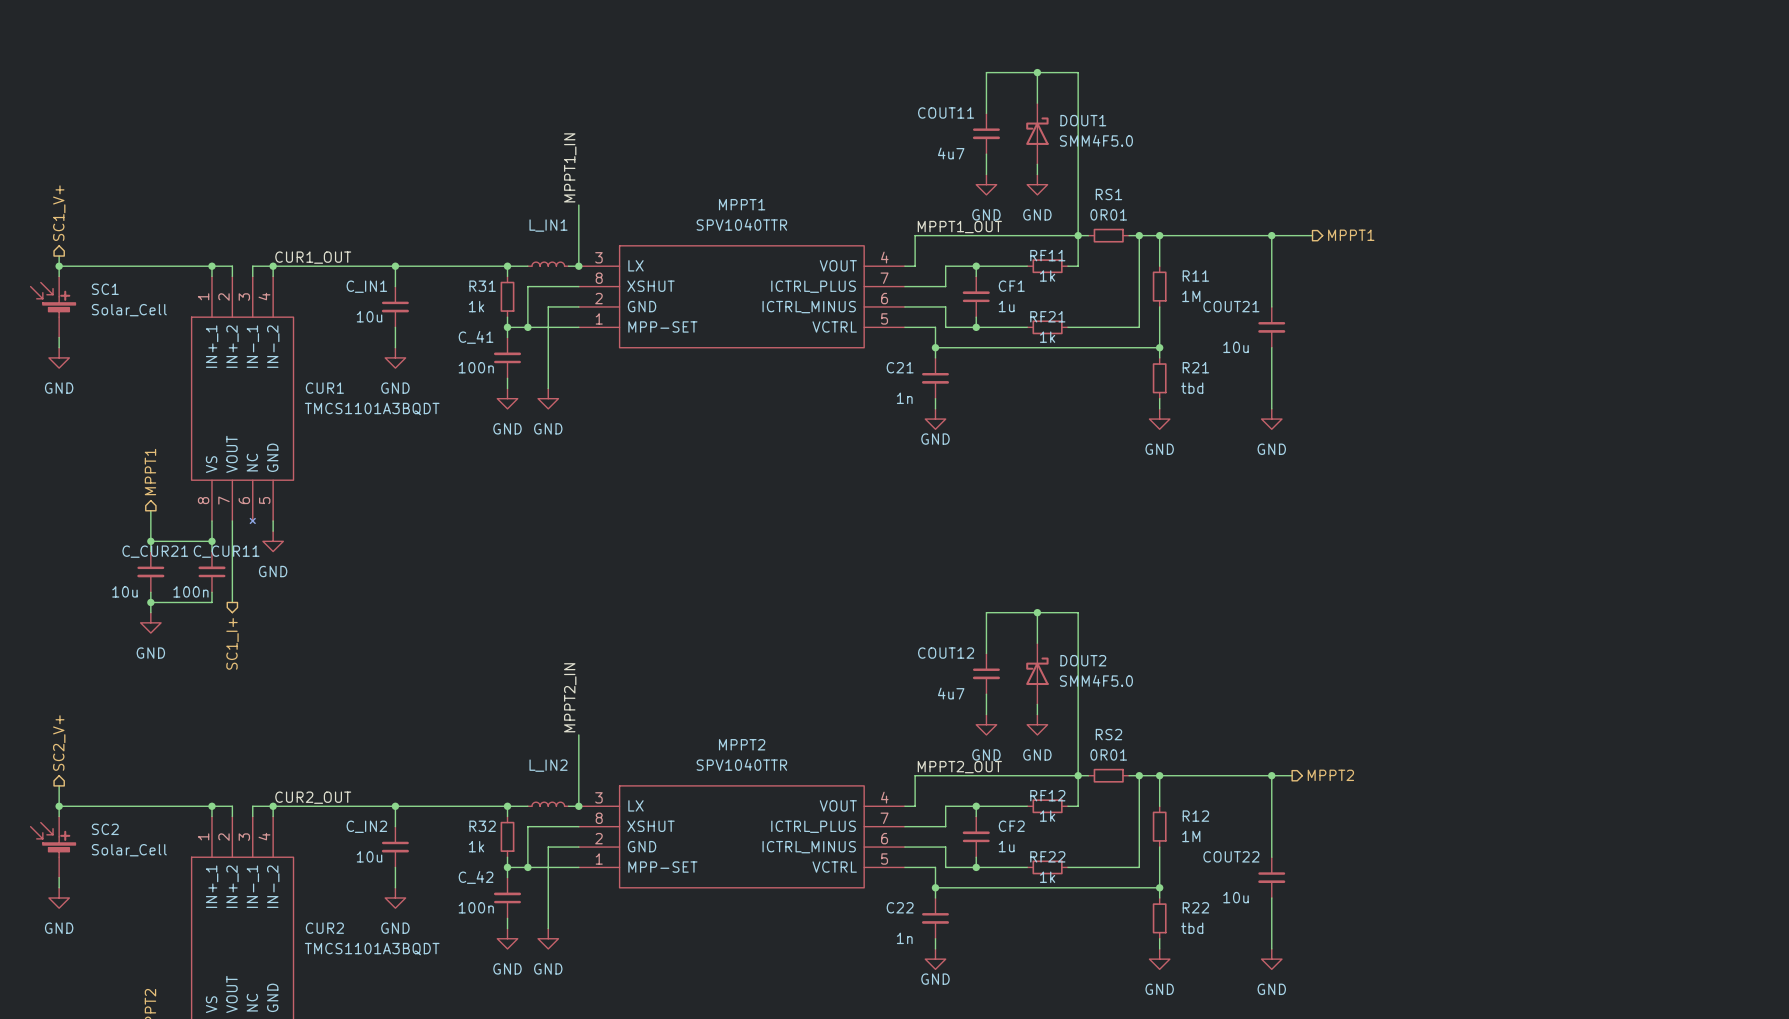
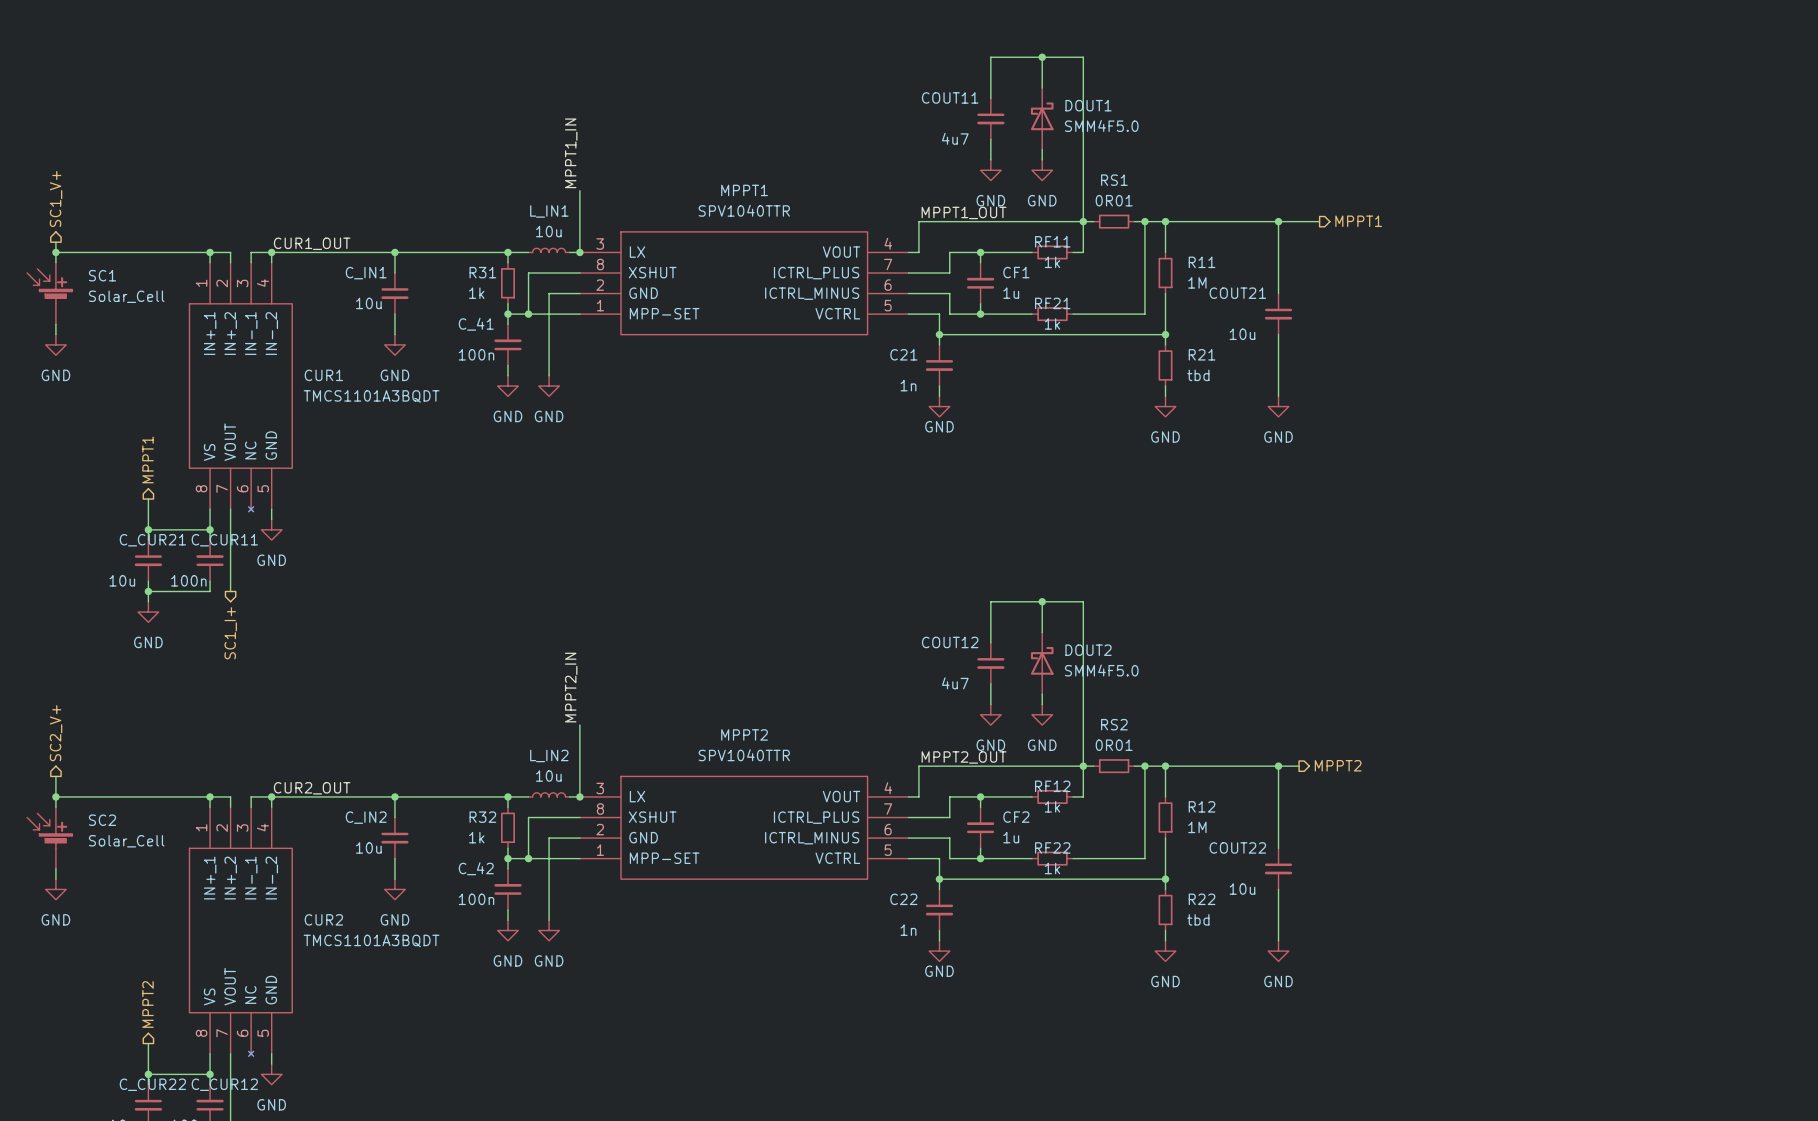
L_IN1 value: none -> 10u (548, 231)
L_IN2 value: none -> 10u (548, 776)

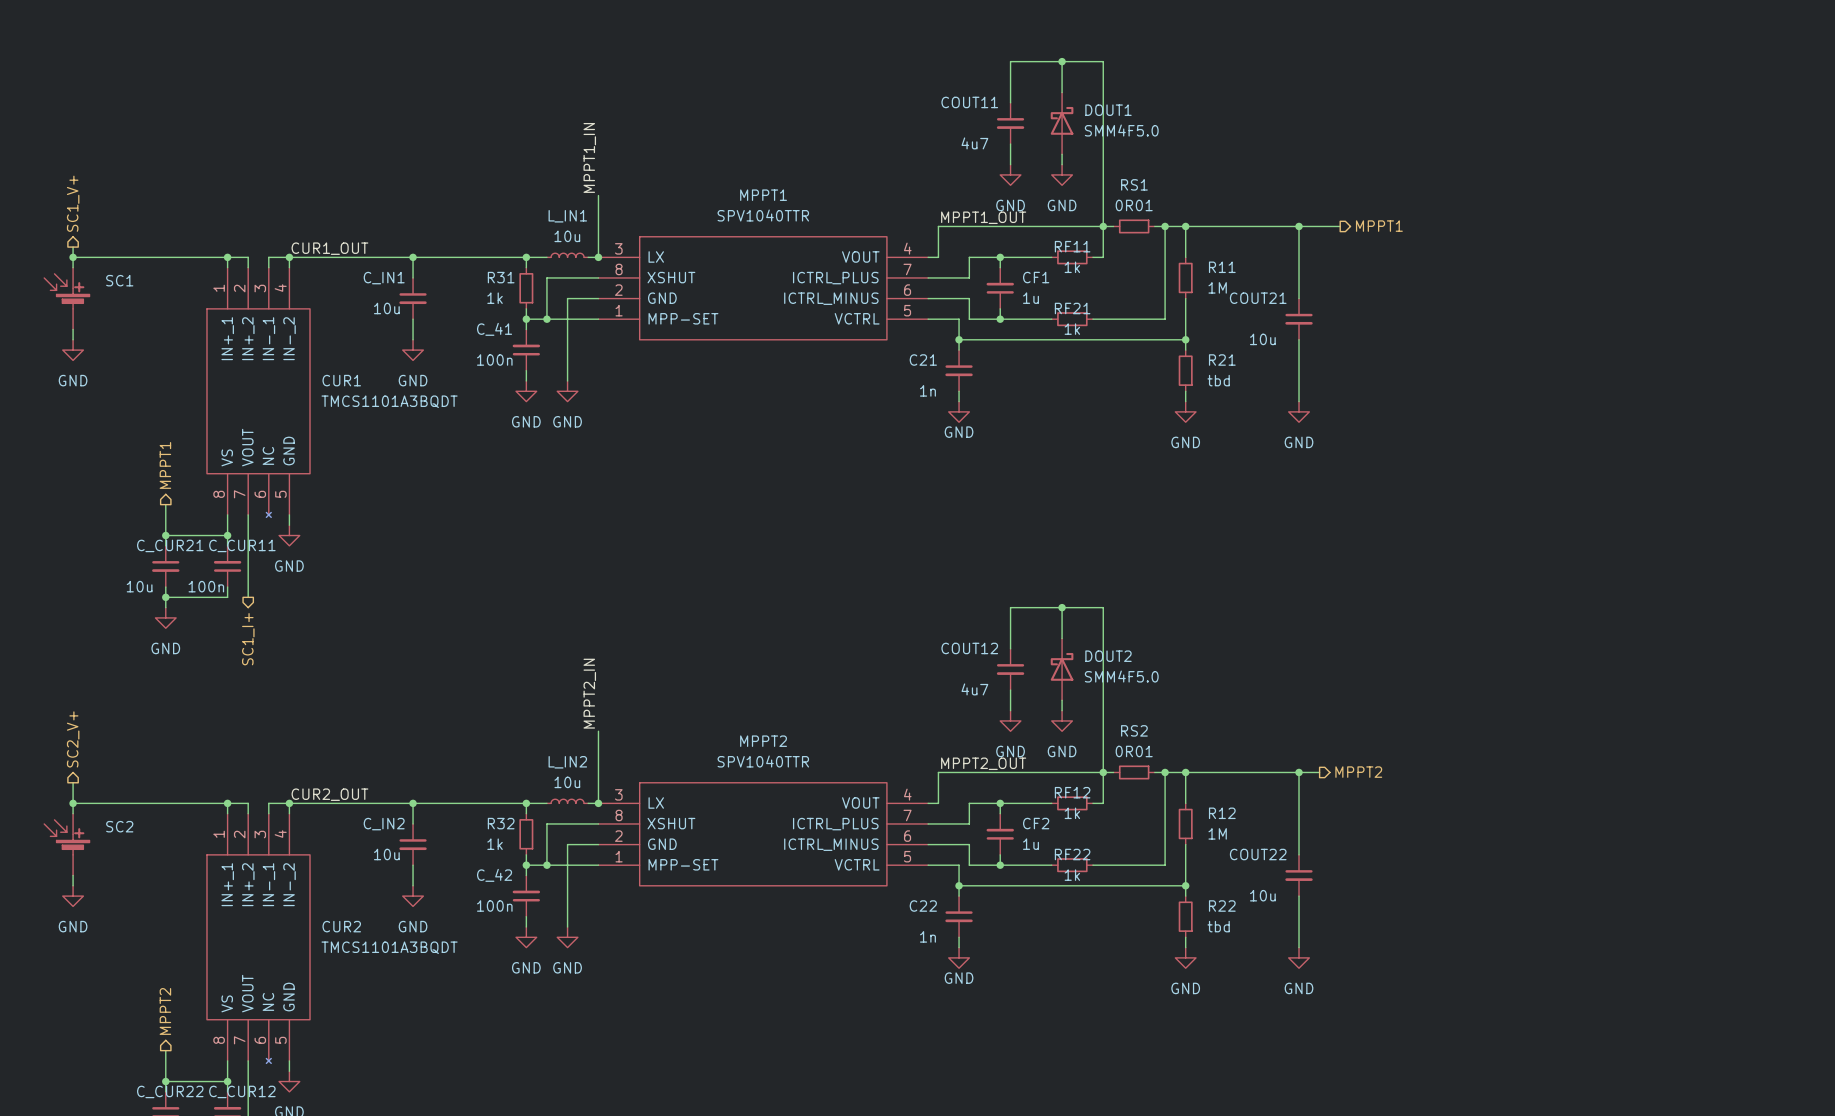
SC1 value: Solar_Cell (126, 296) -> none
SC2 value: Solar_Cell (126, 841) -> none

